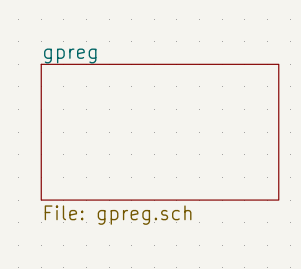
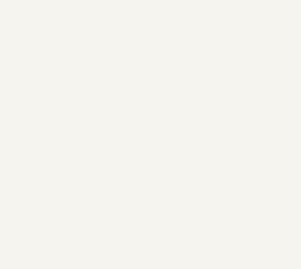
sheet gpreg: File: gpreg.sch (160, 132) -> none

